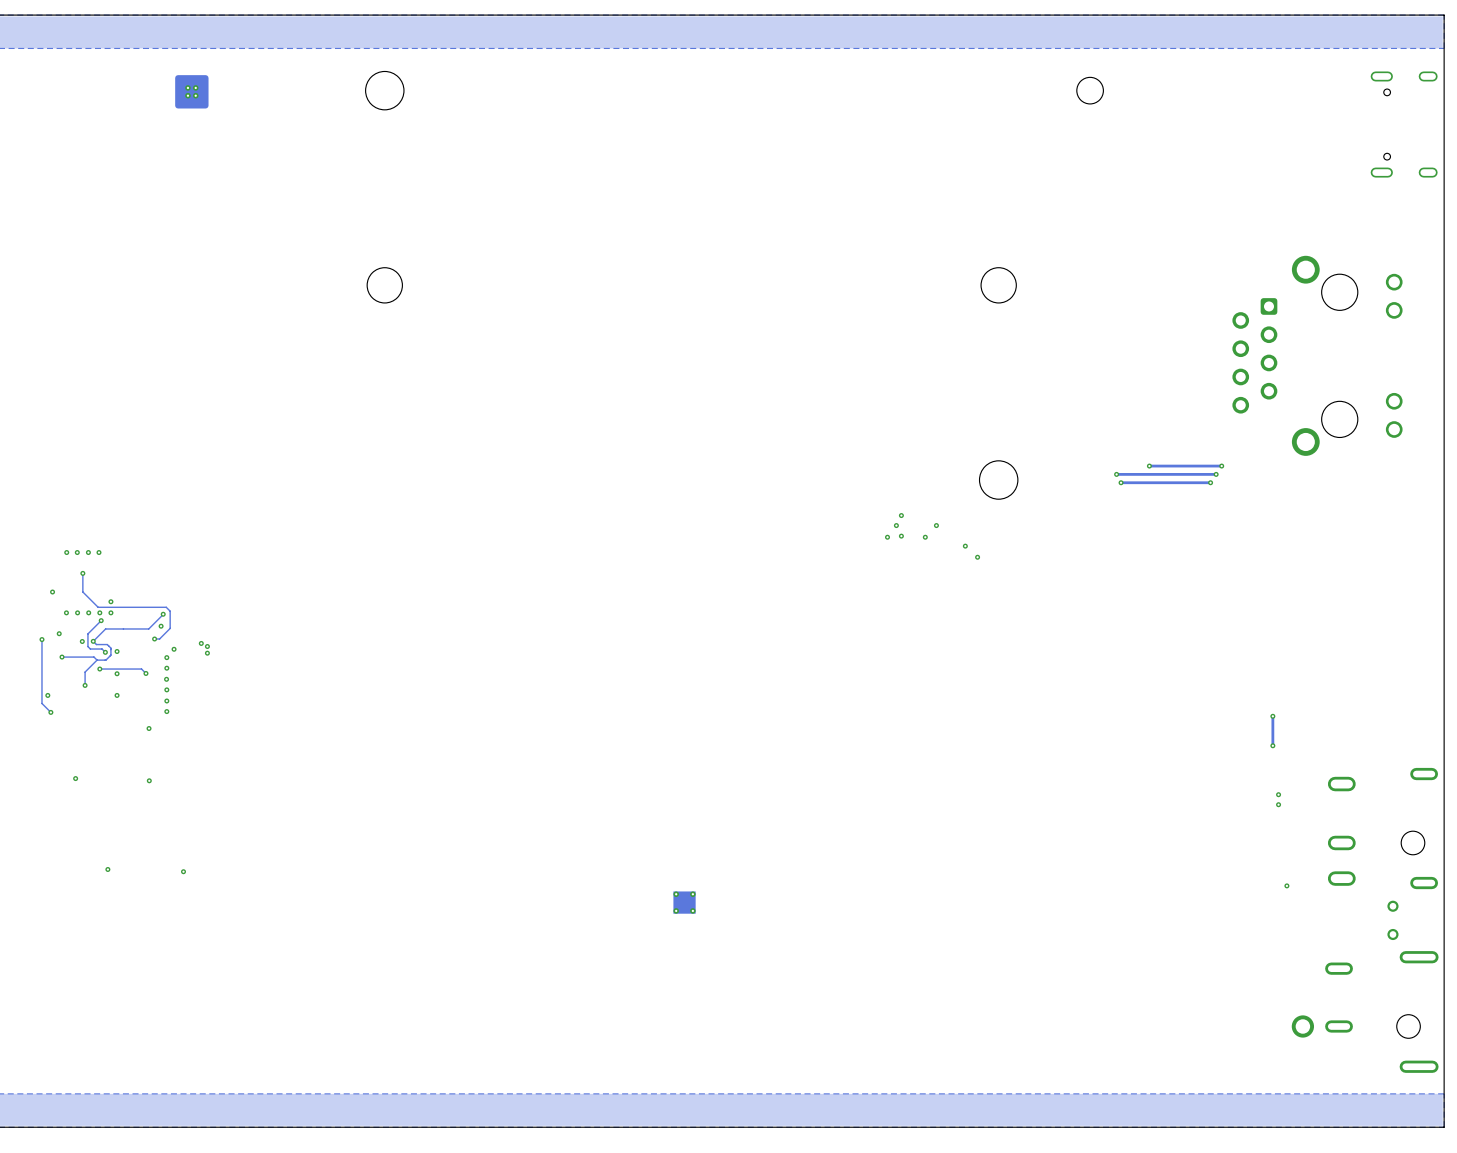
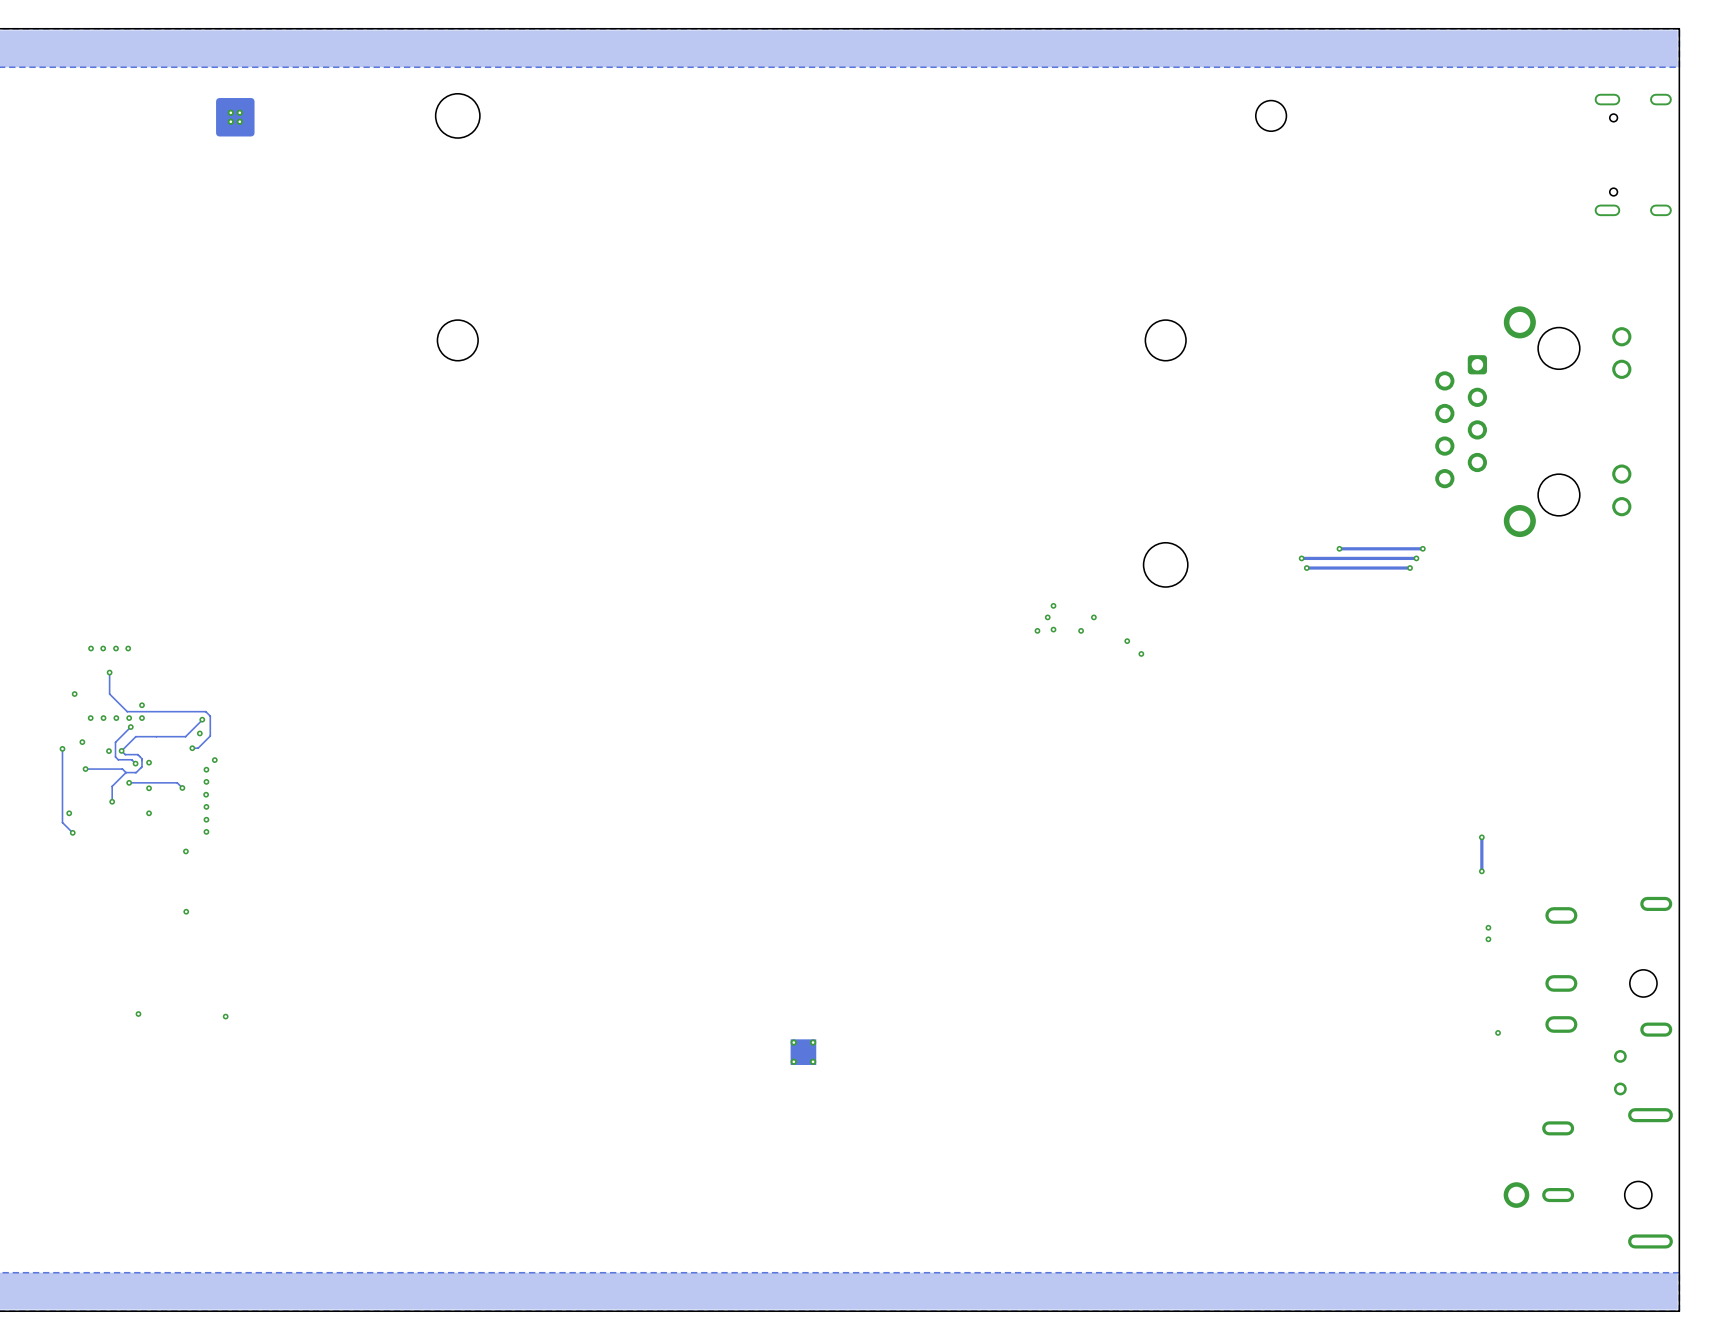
via: (201, 643) -> none
via: (207, 646) -> none
via: (207, 653) -> none
via: (75, 778) -> none

